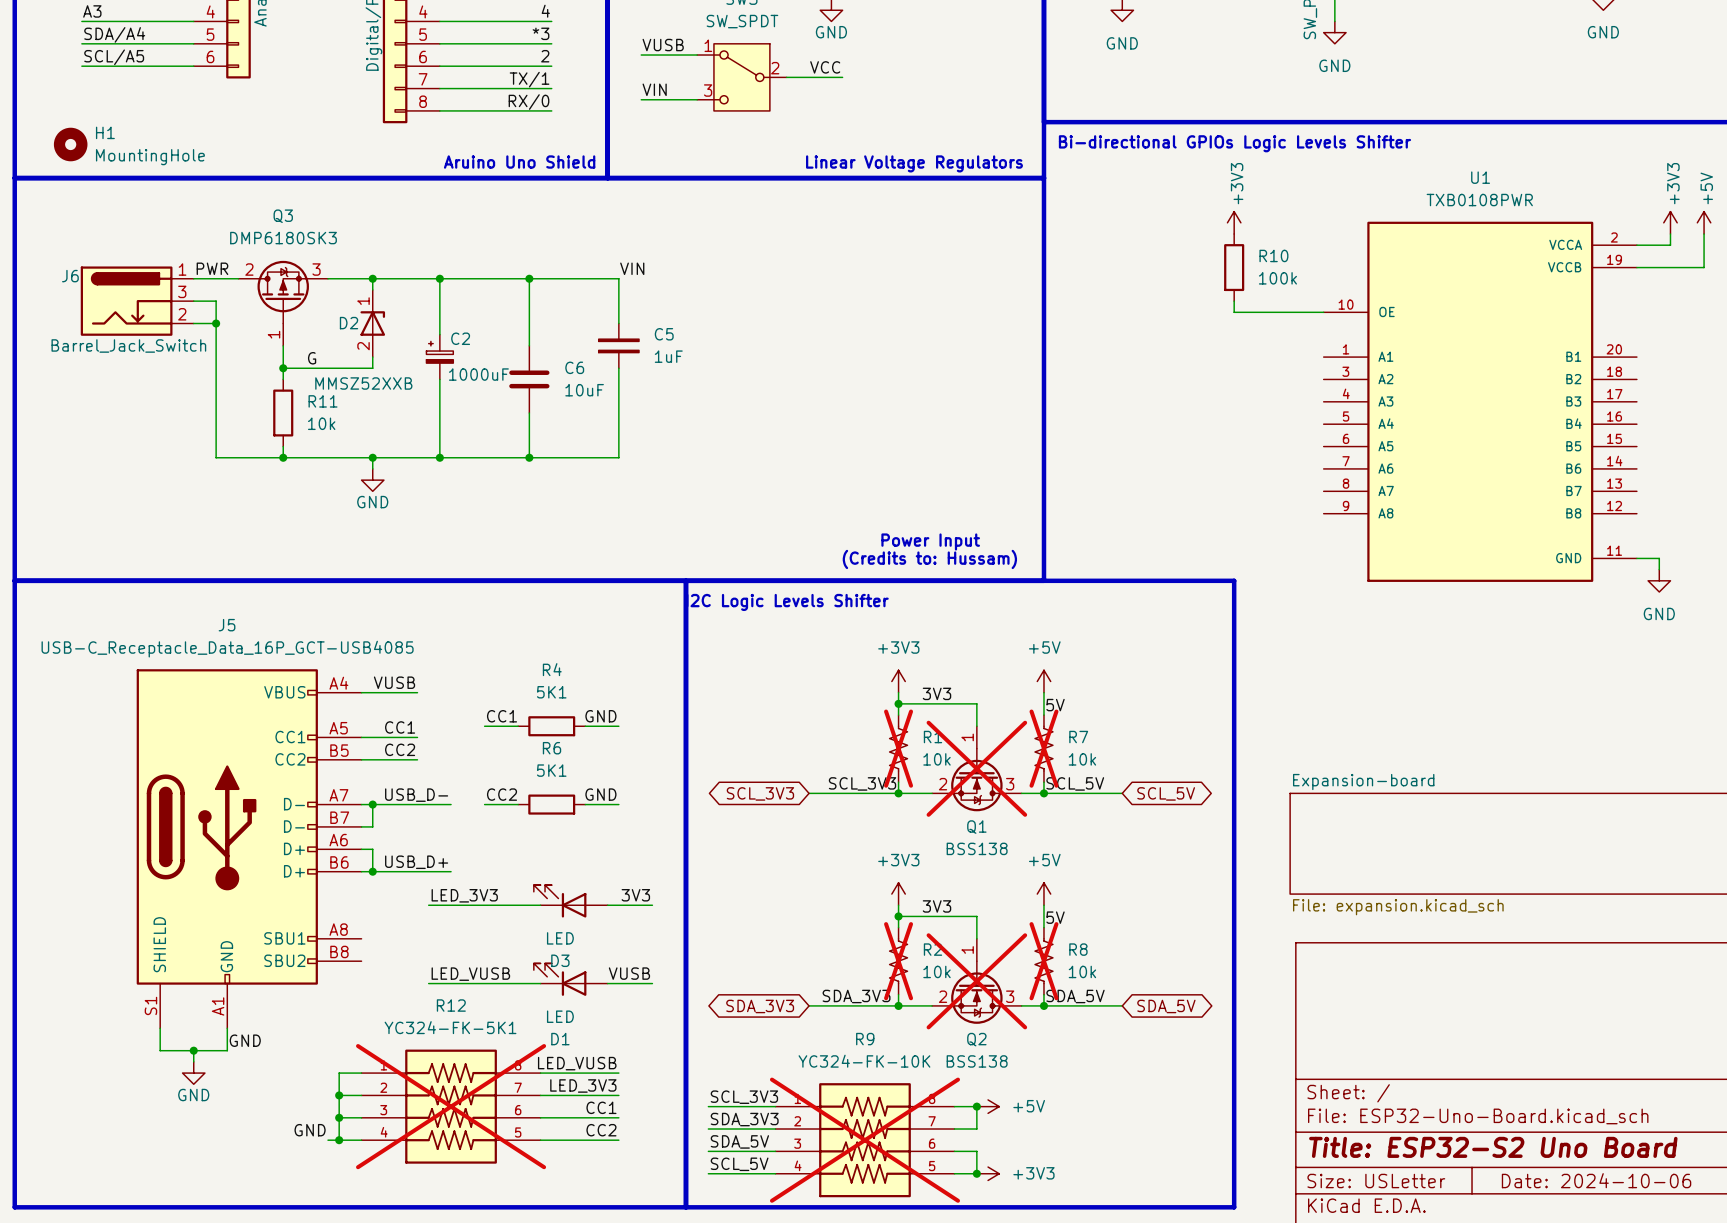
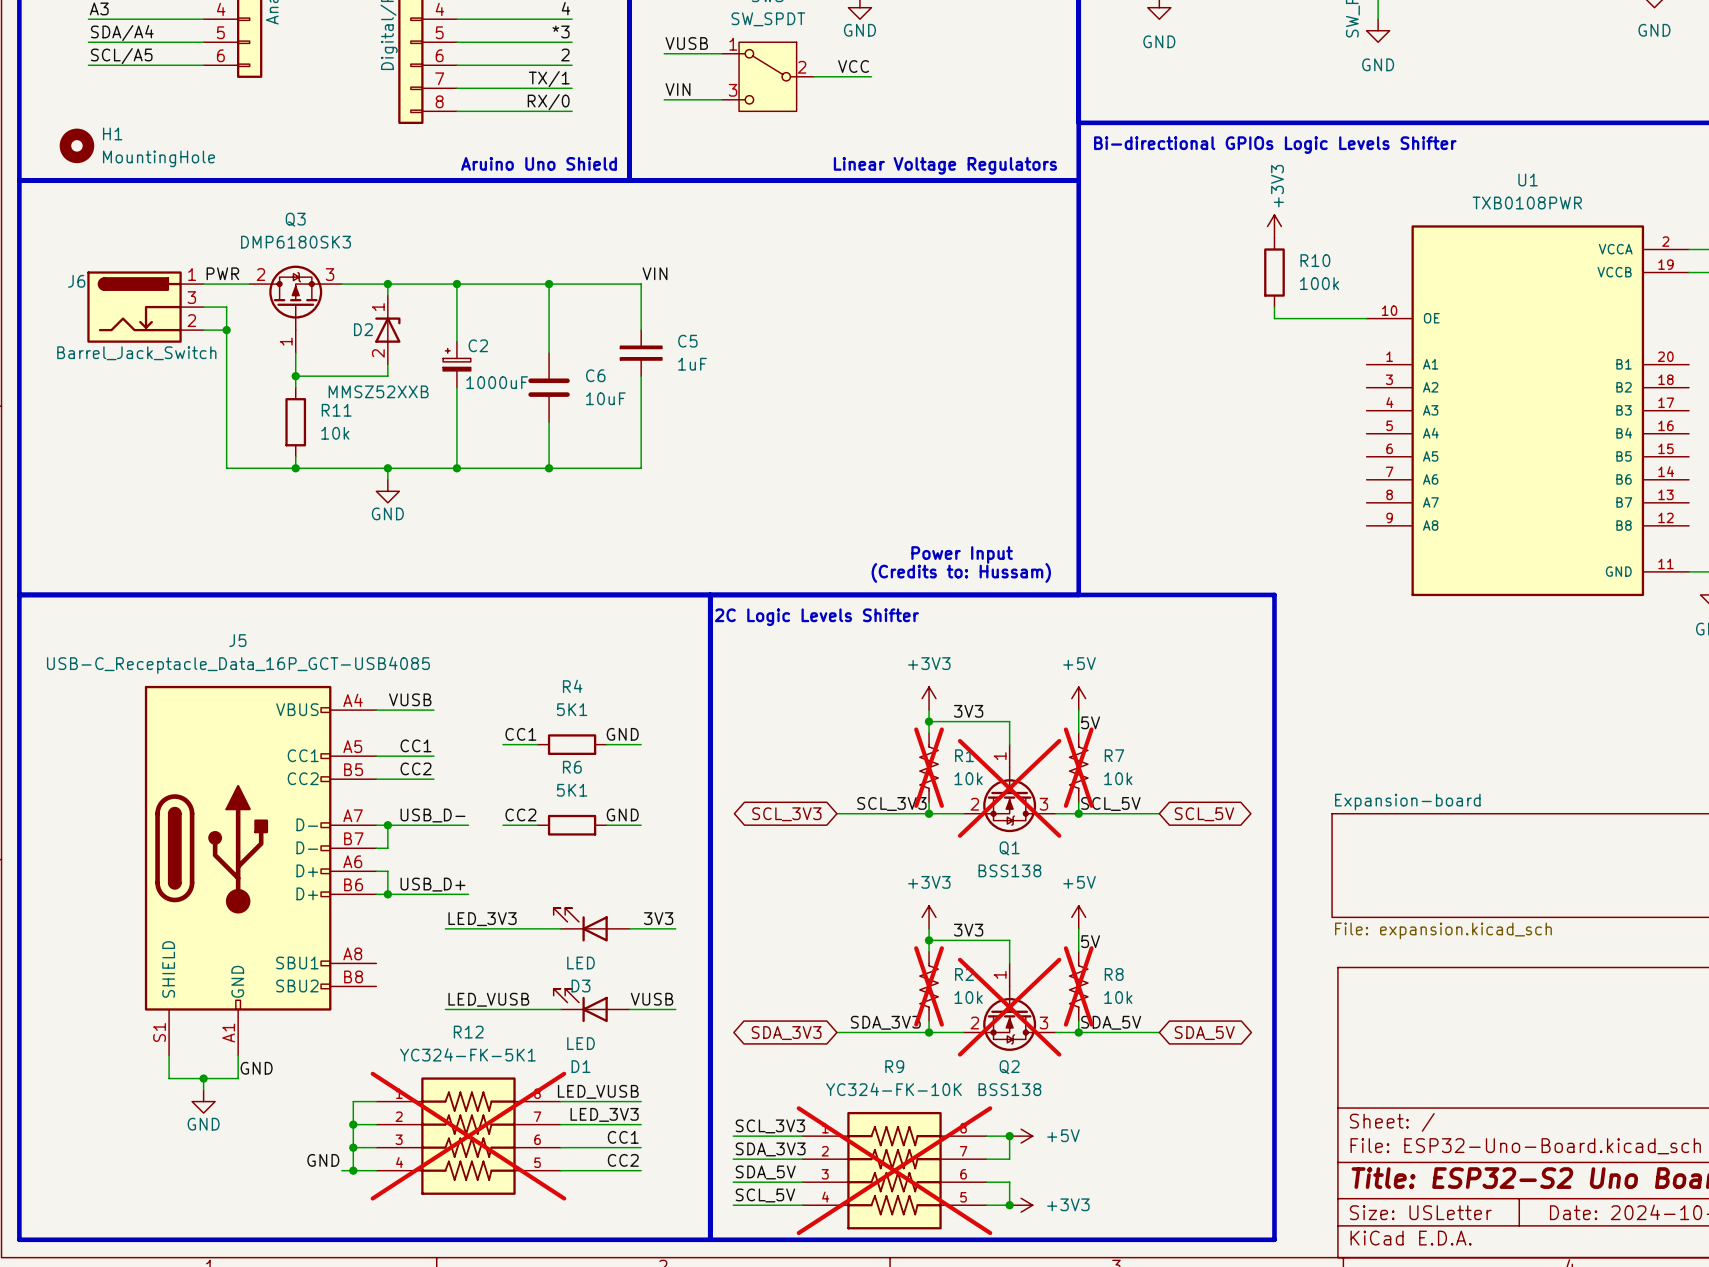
label: G (312, 358) -> none

